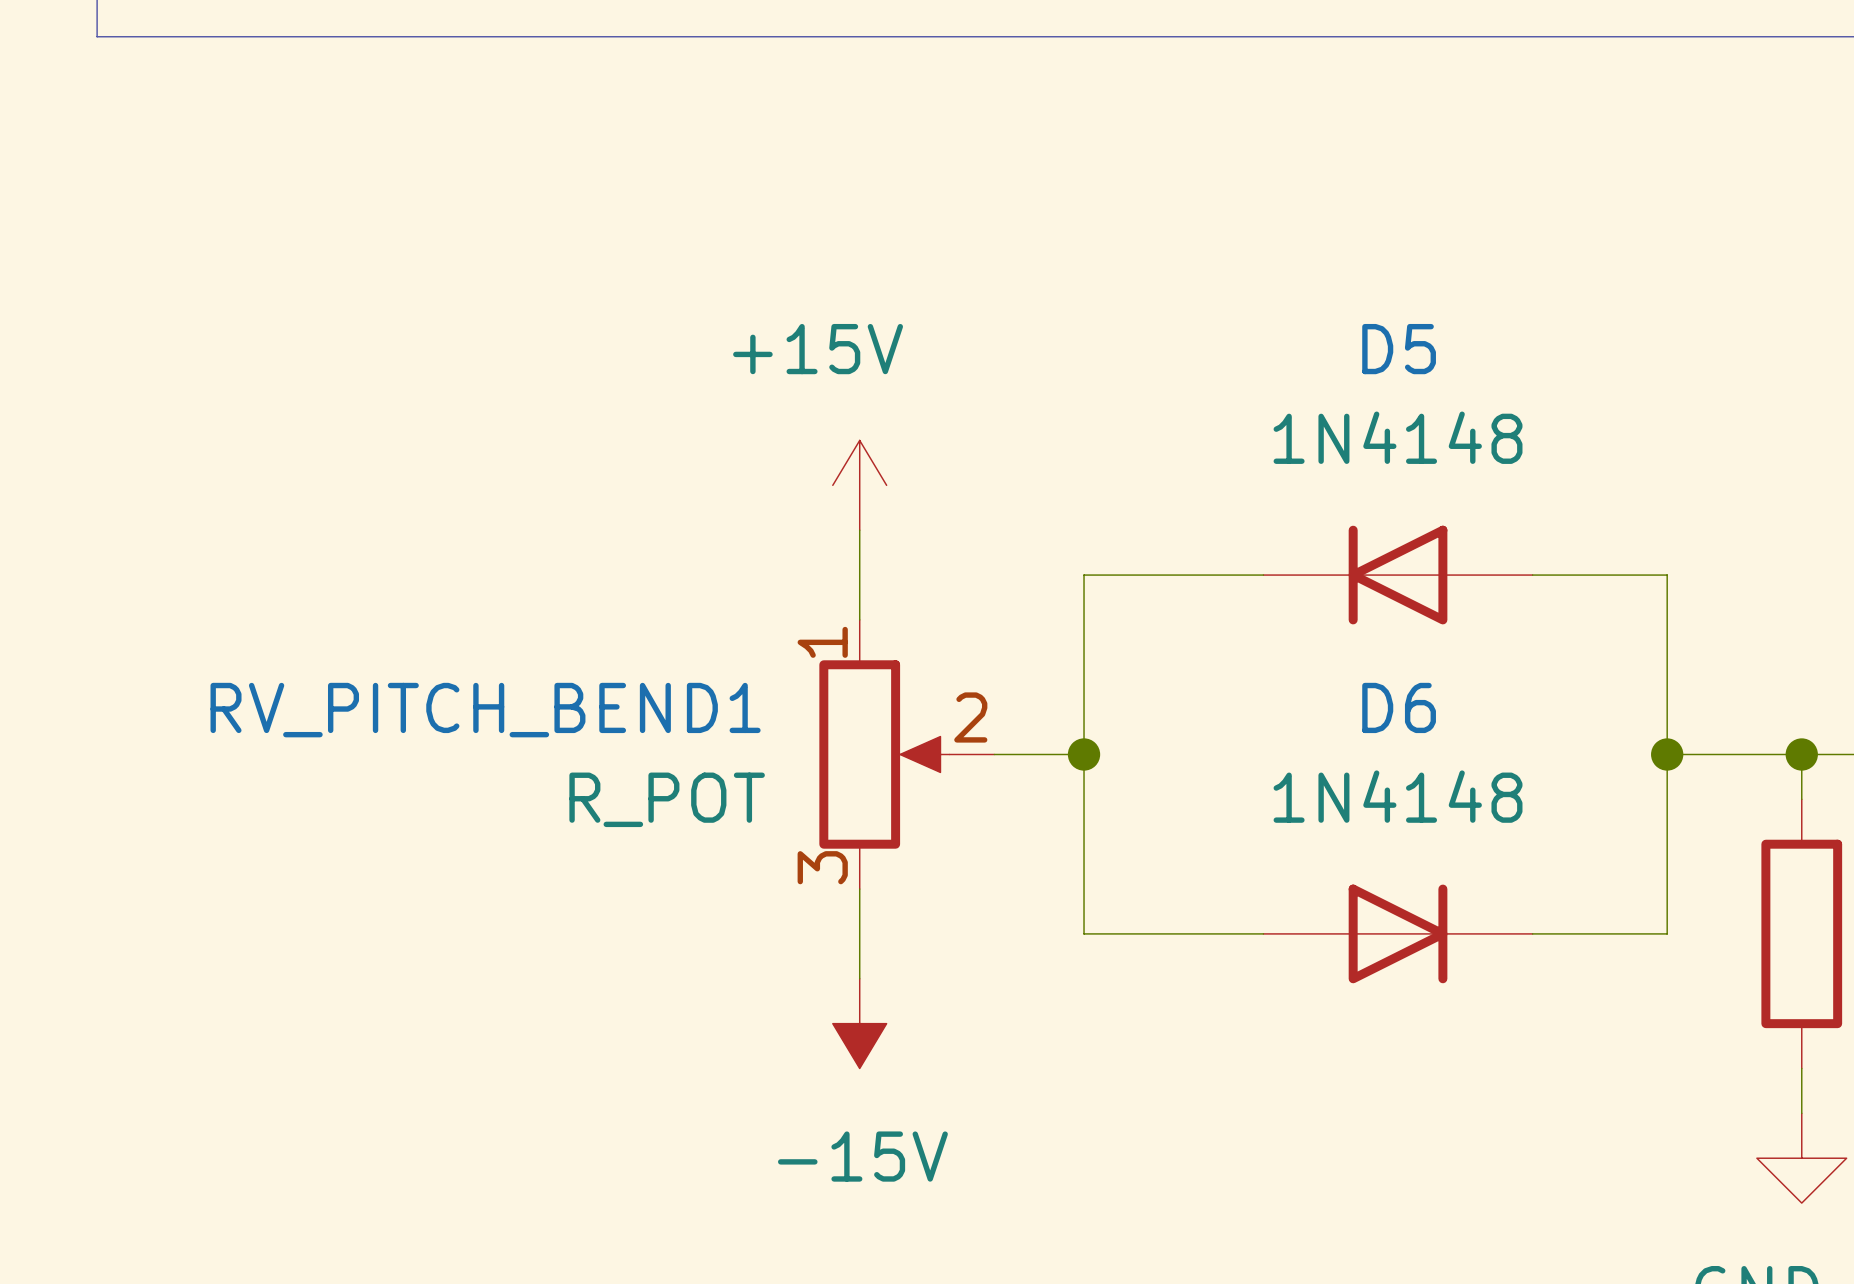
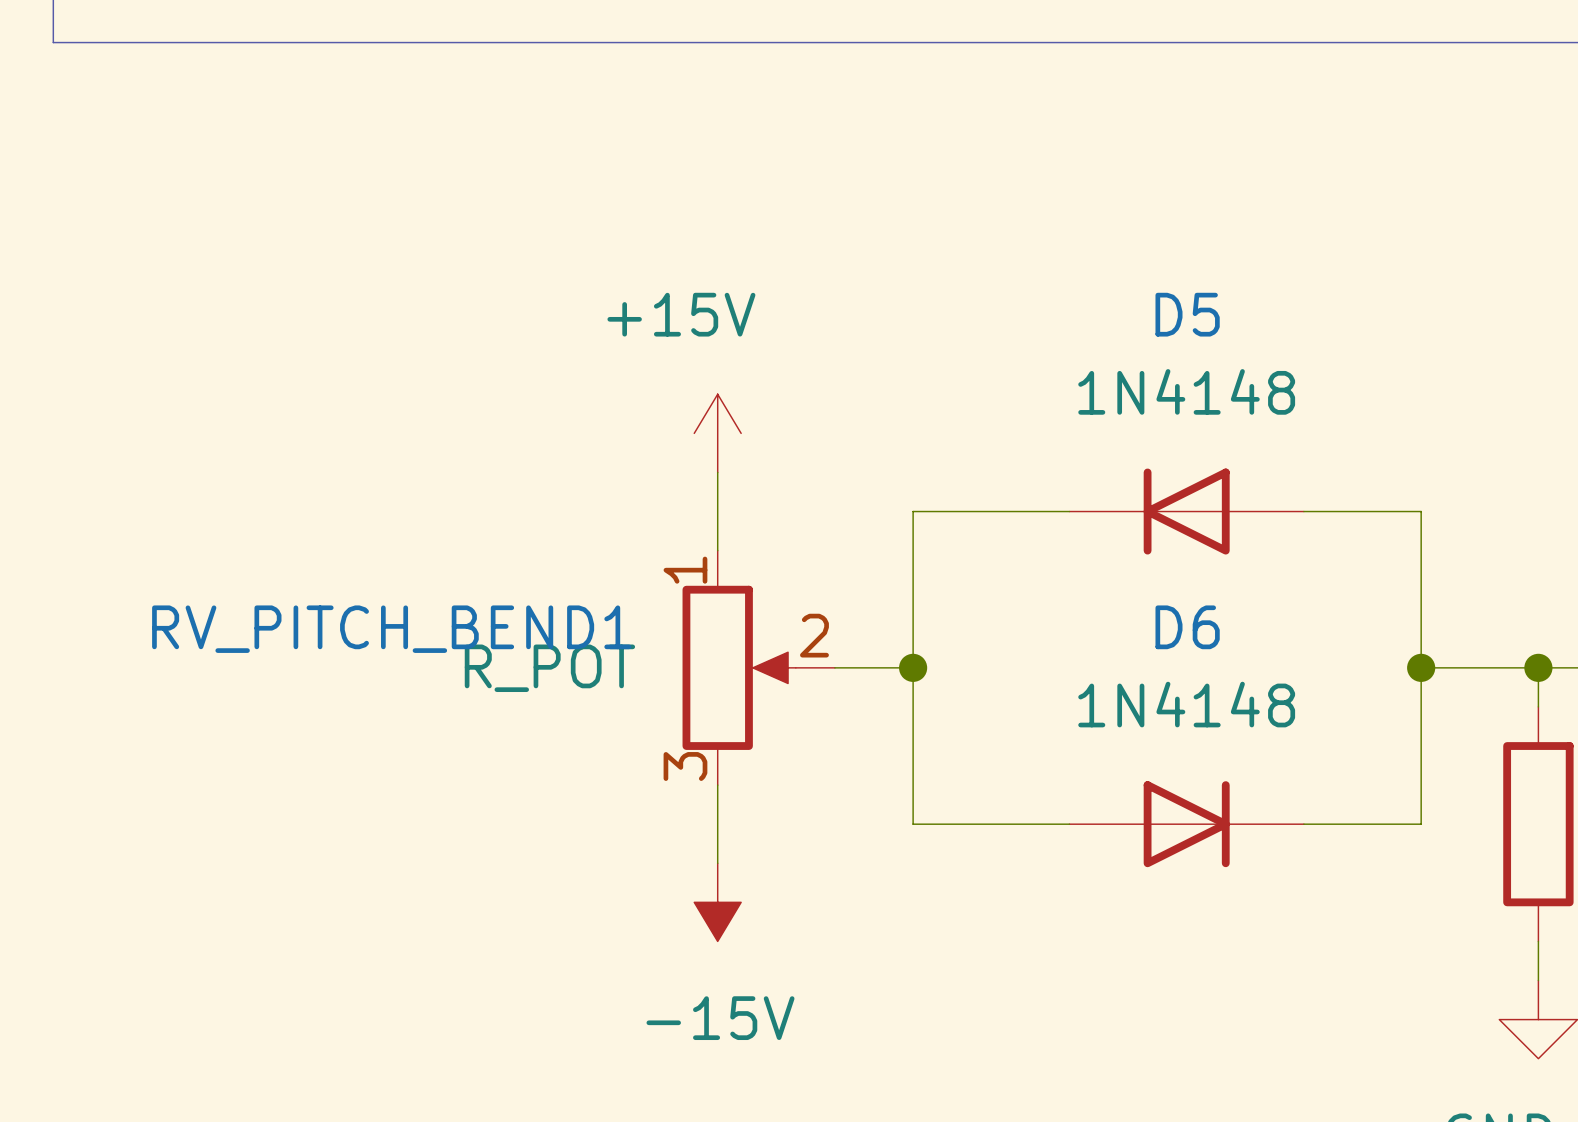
RV_PITCH_BEND1 value position: R_POT (667, 799) -> R_POT (549, 668)

